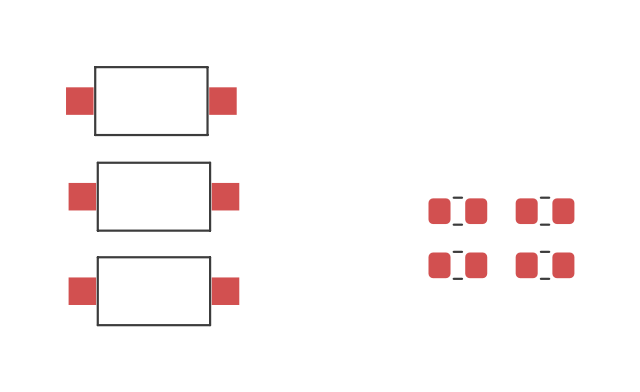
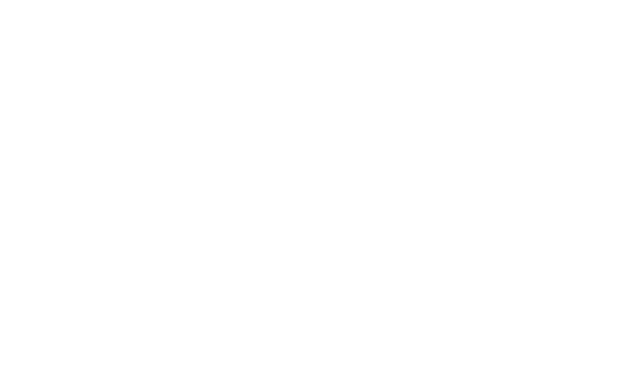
part: (151, 101) -> none
part: (153, 196) -> none
part: (457, 211) -> none
part: (545, 211) -> none
part: (457, 265) -> none
part: (545, 265) -> none
part: (153, 291) -> none

